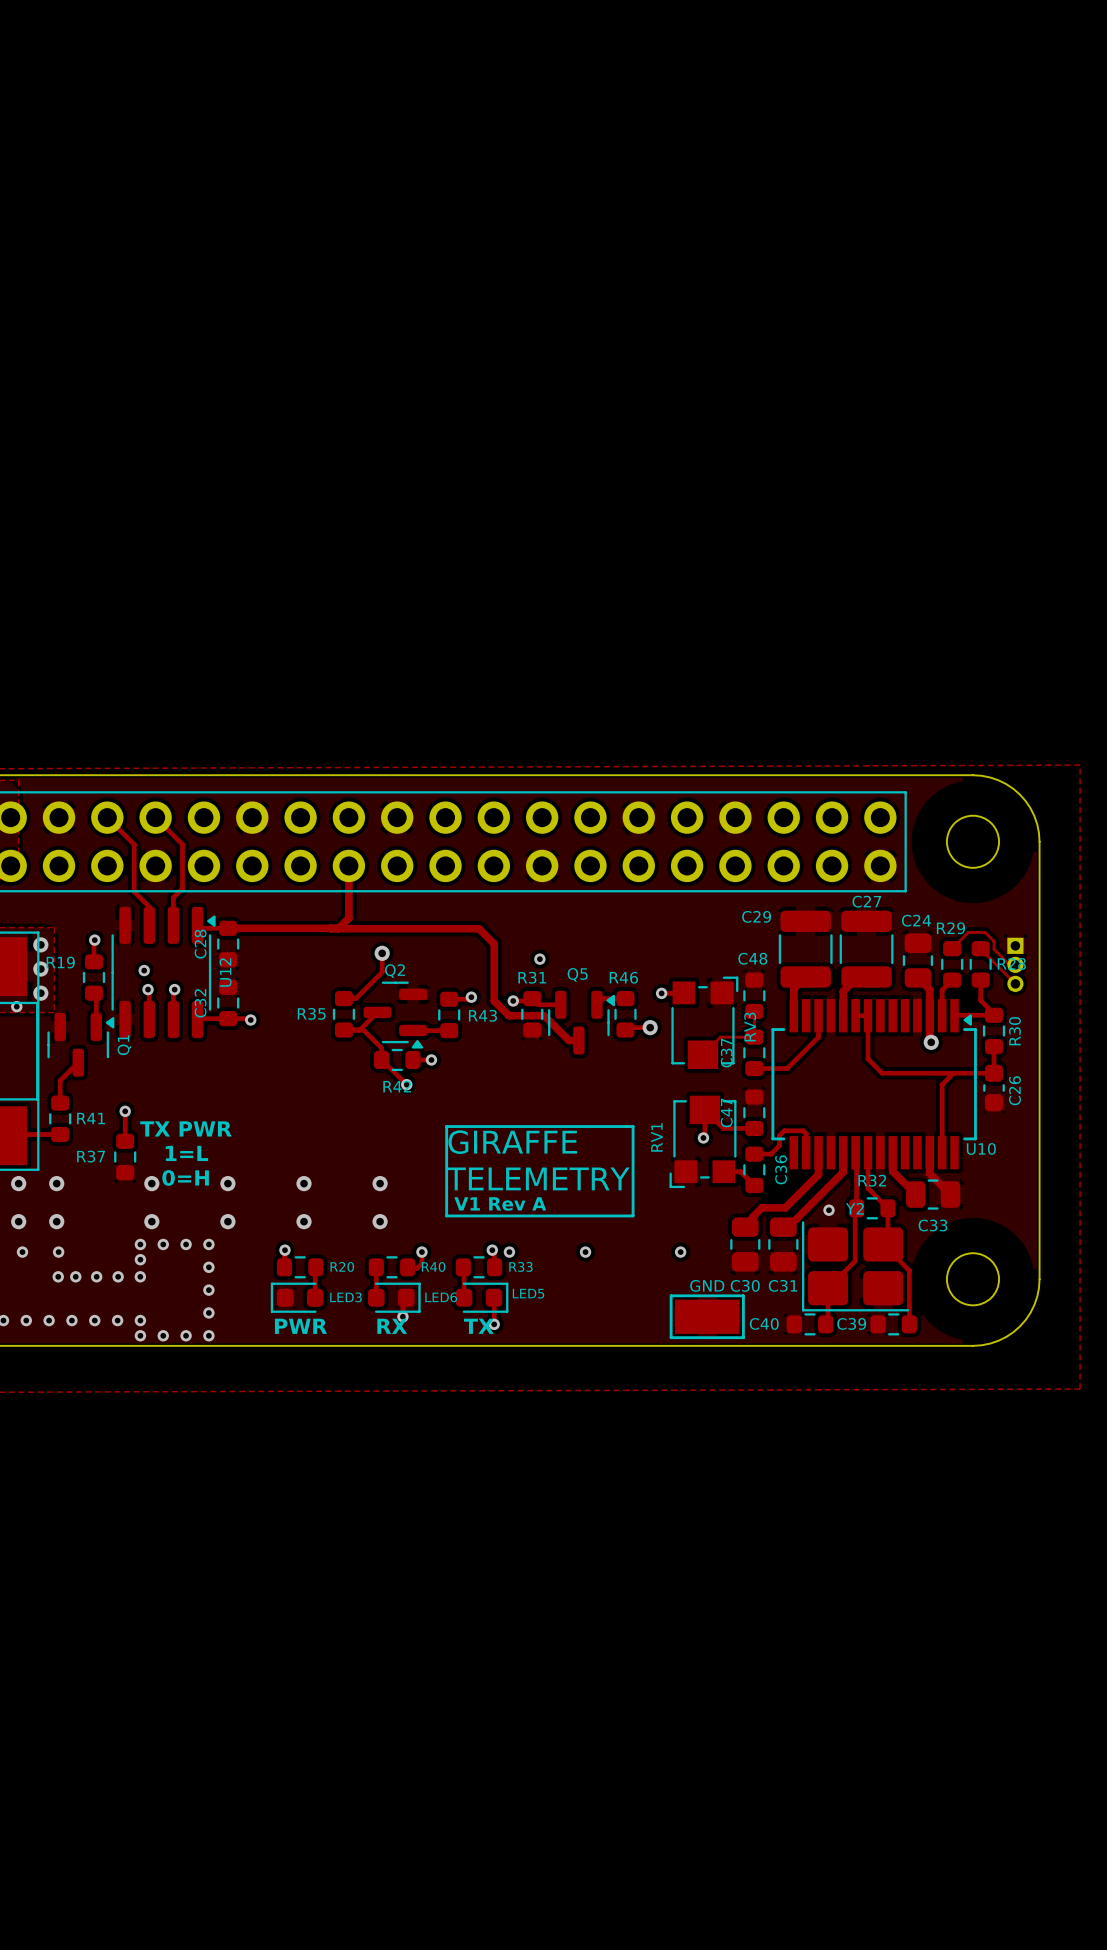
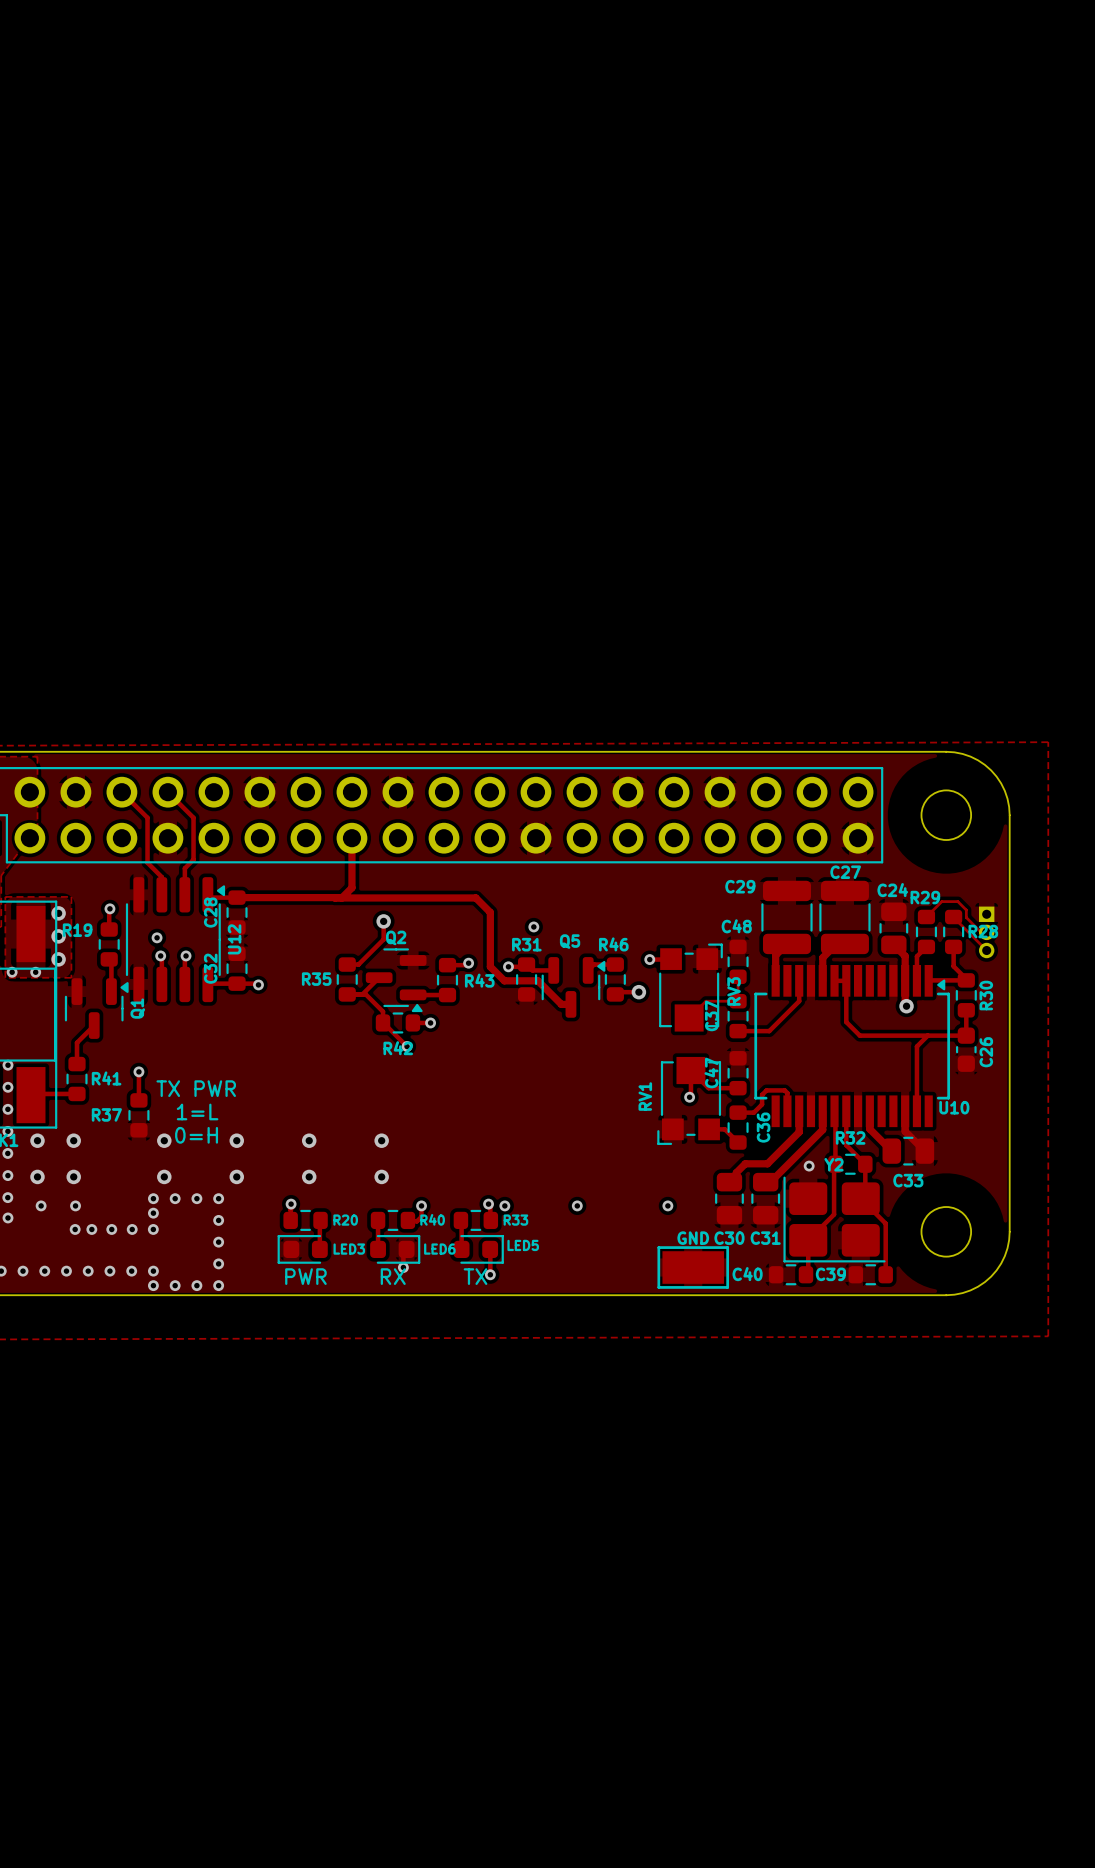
line: (446, 1126) (633, 1126) (633, 1215) (446, 1215) (446, 1126) -> none
text: GIRAFFE (512, 1142) -> none
text: TELEMETRY (538, 1178) -> none
text: V1 Rev A (500, 1203) -> none

